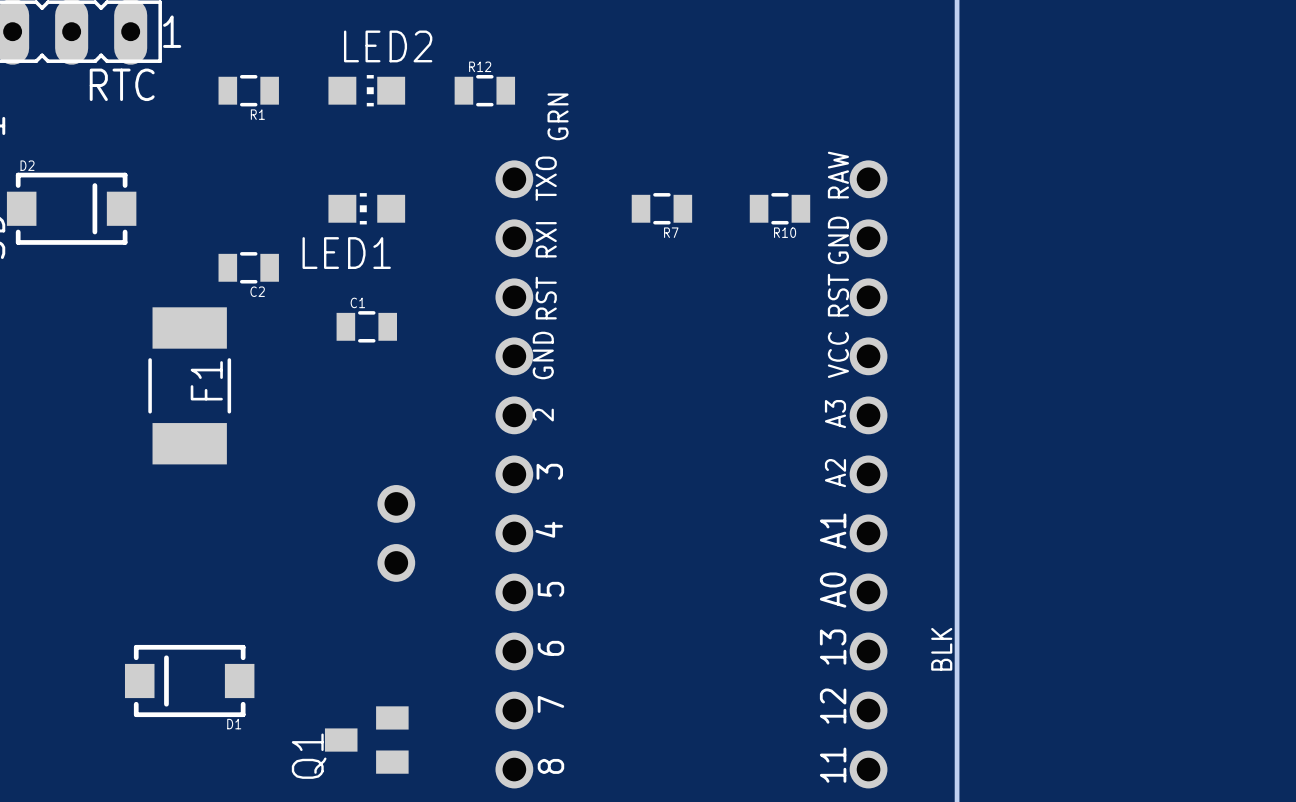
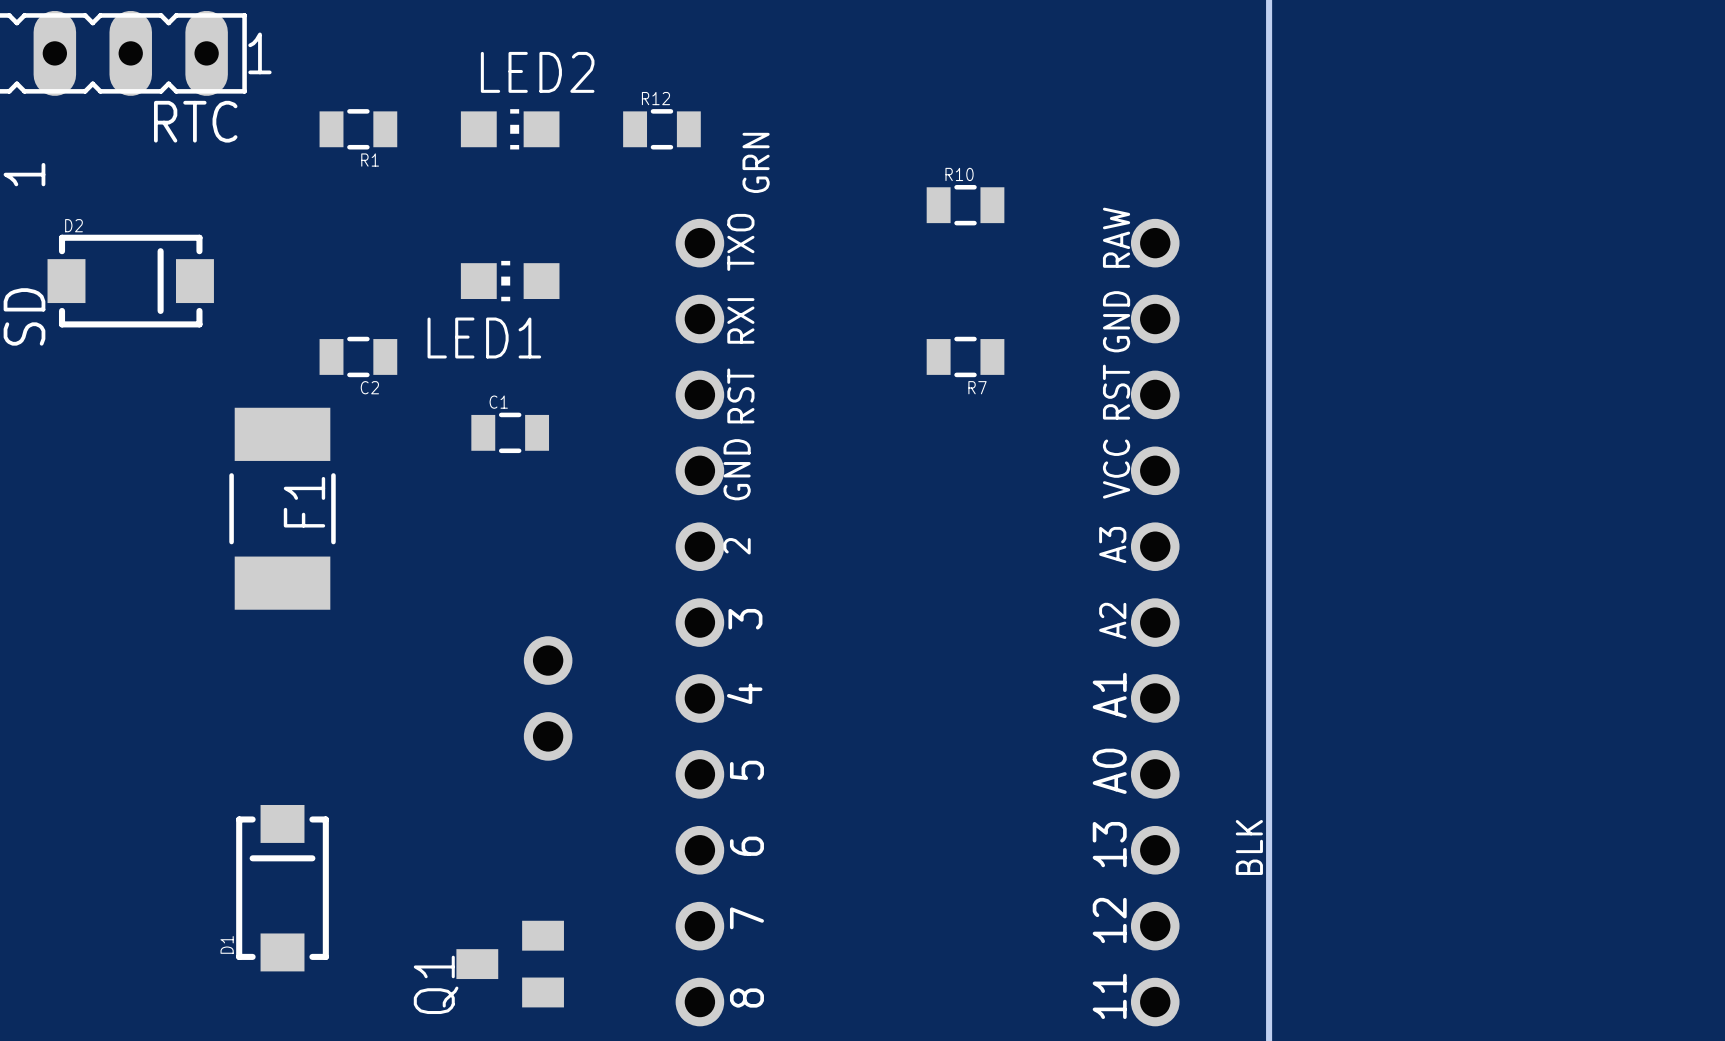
R7 position: (661, 208) -> (965, 356)
R10 position: (779, 208) -> (965, 205)
R10 name position: R10 (785, 232) -> R10 (959, 174)
D1 rotation: 0° (189, 681) -> 90° clockwise (282, 888)

